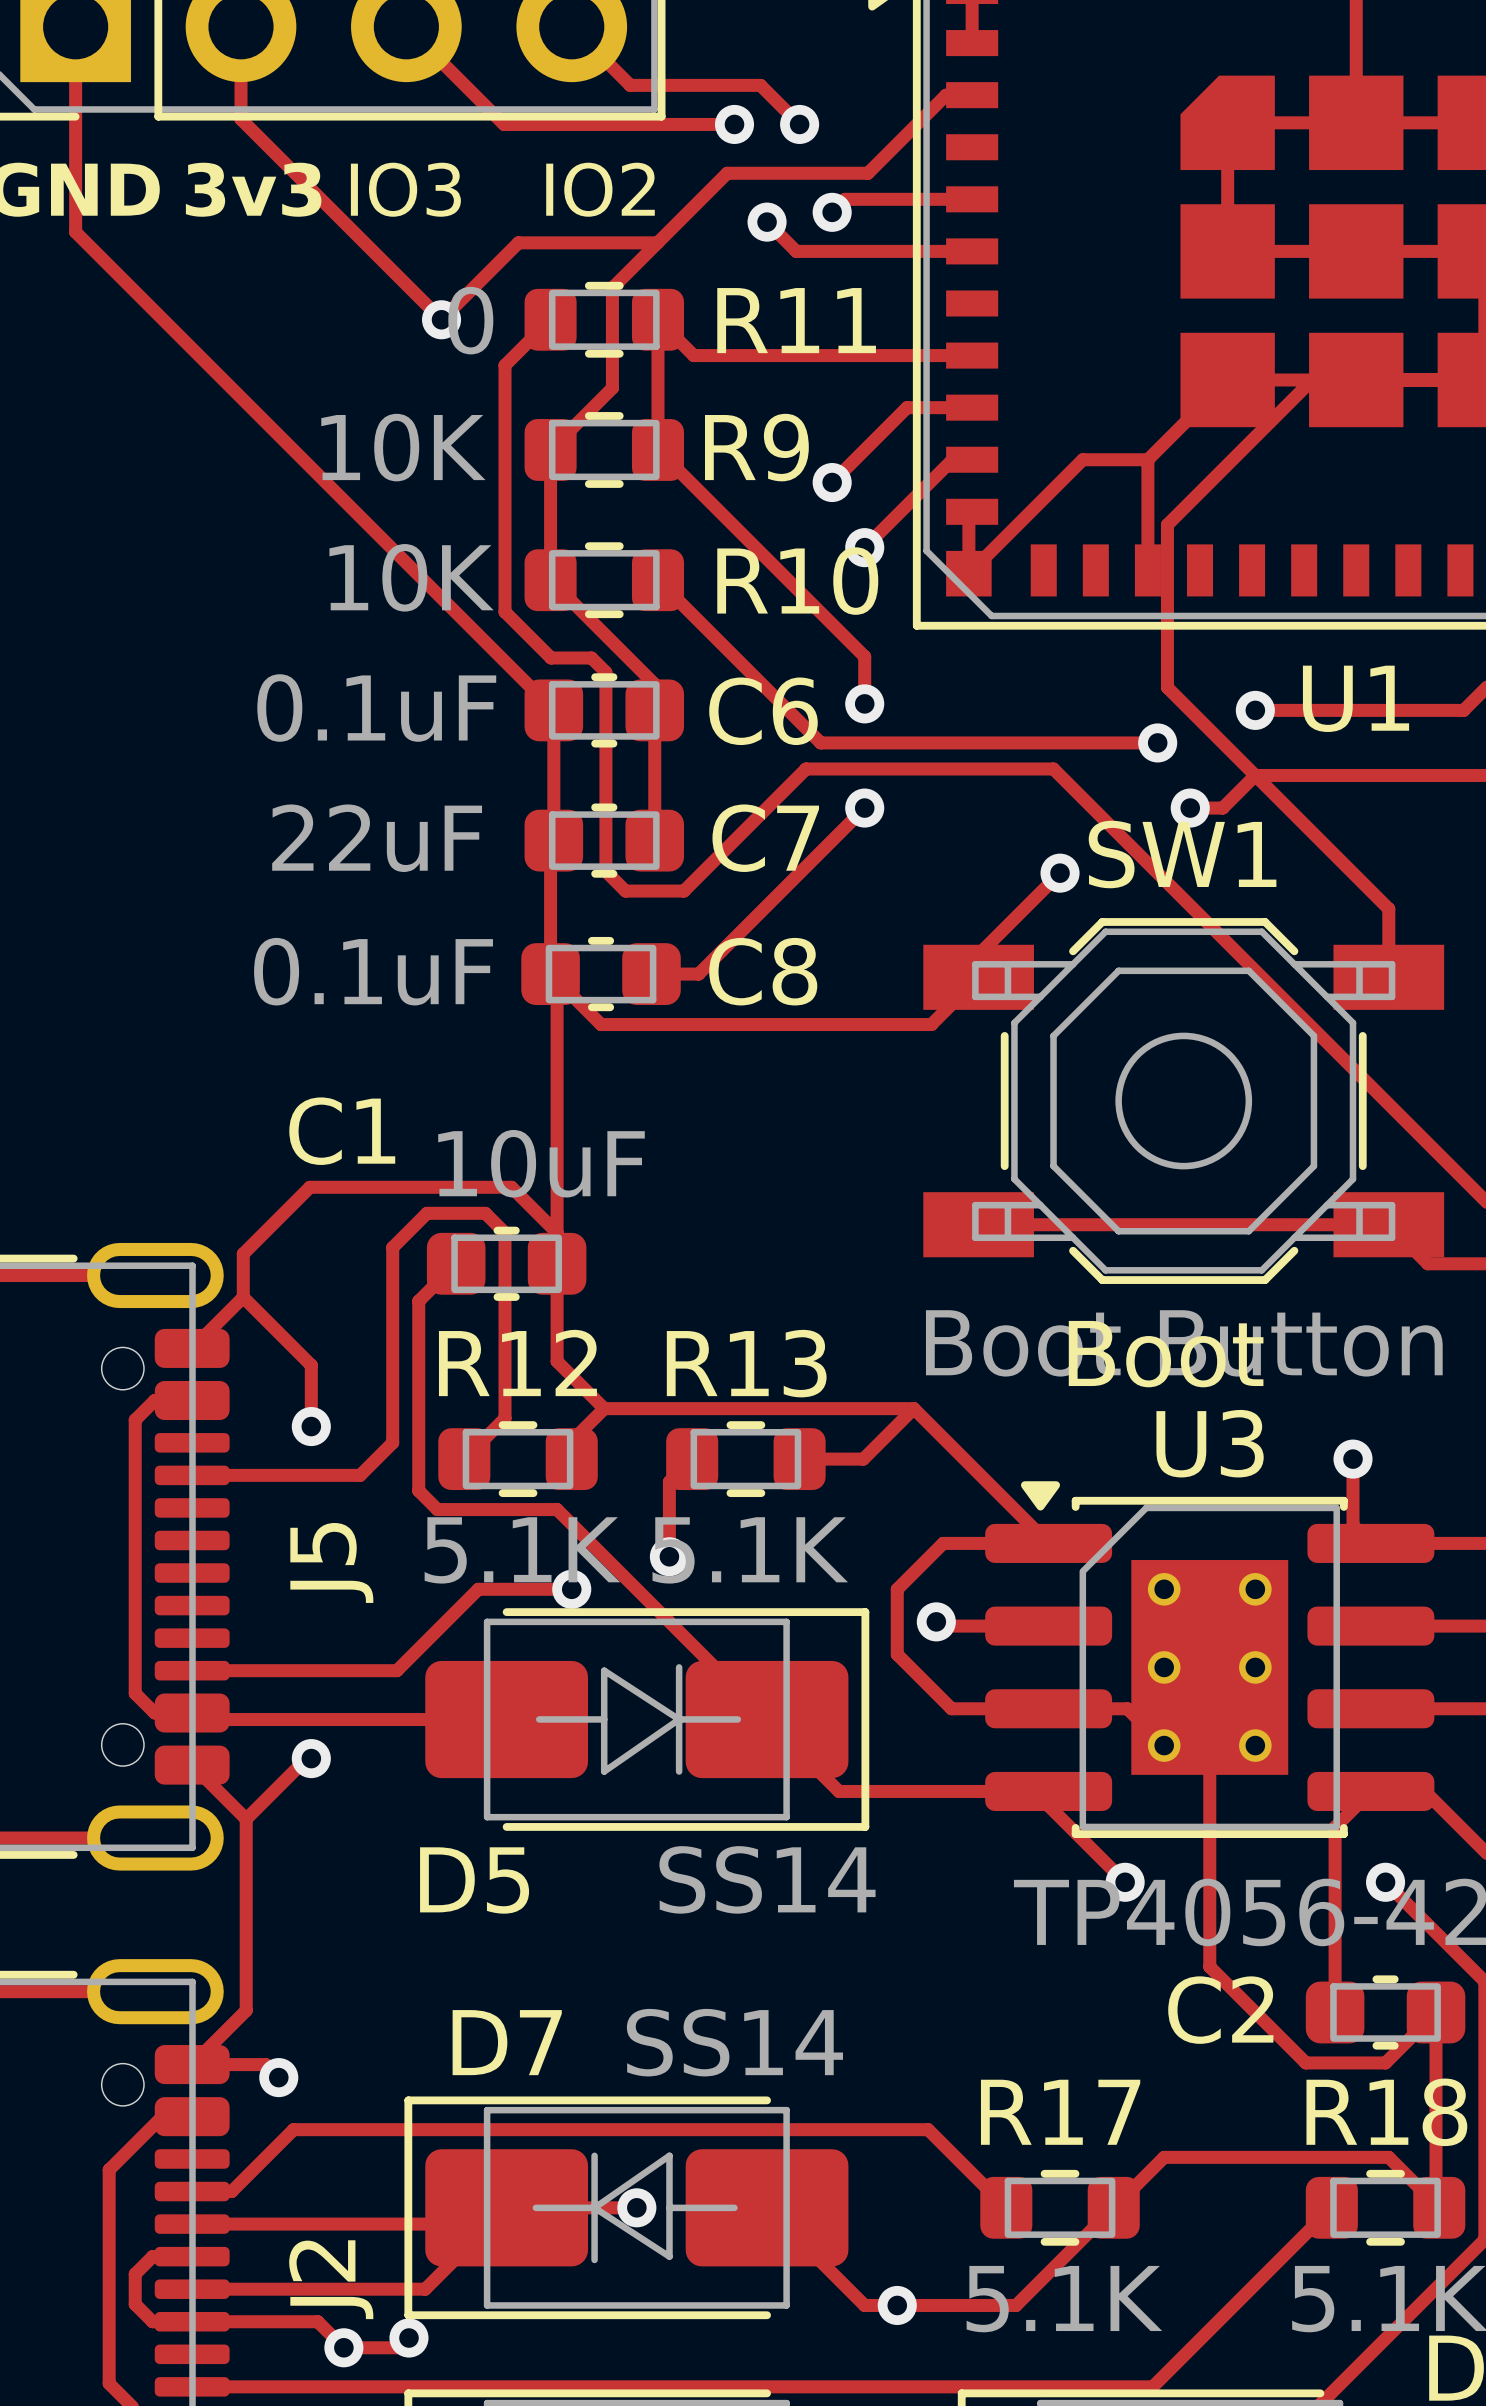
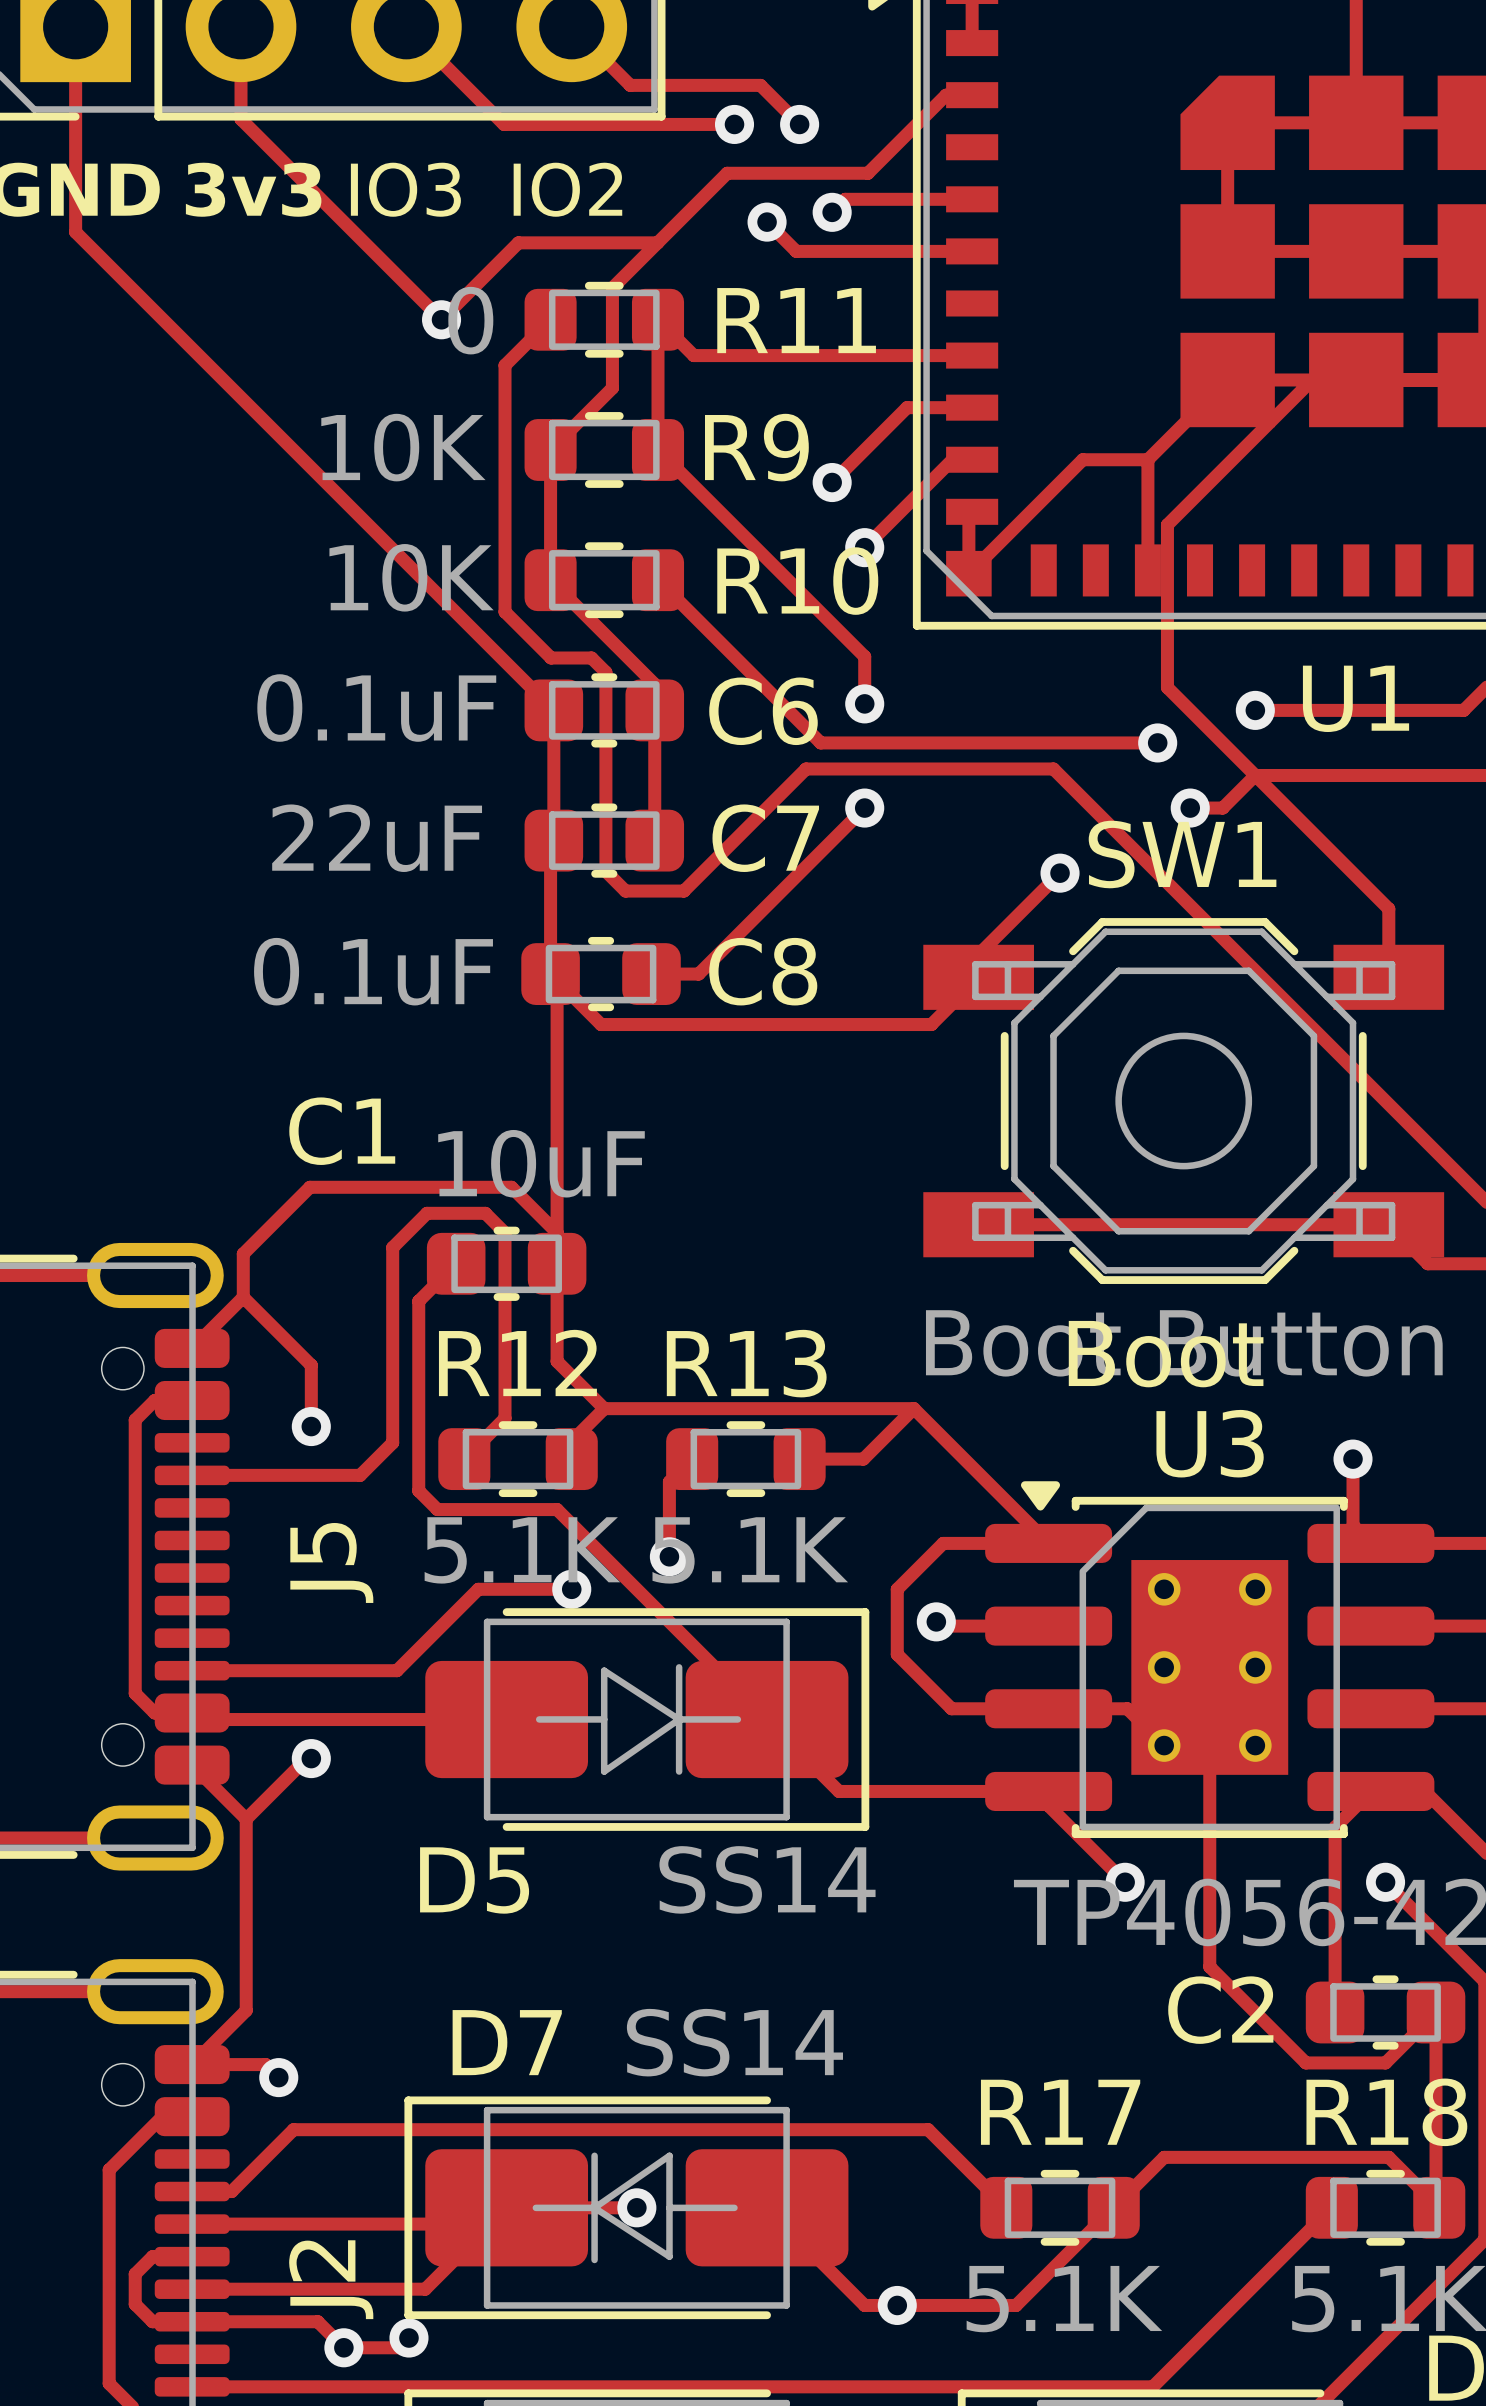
text position: IO2 (600, 189) -> IO2 (567, 189)

